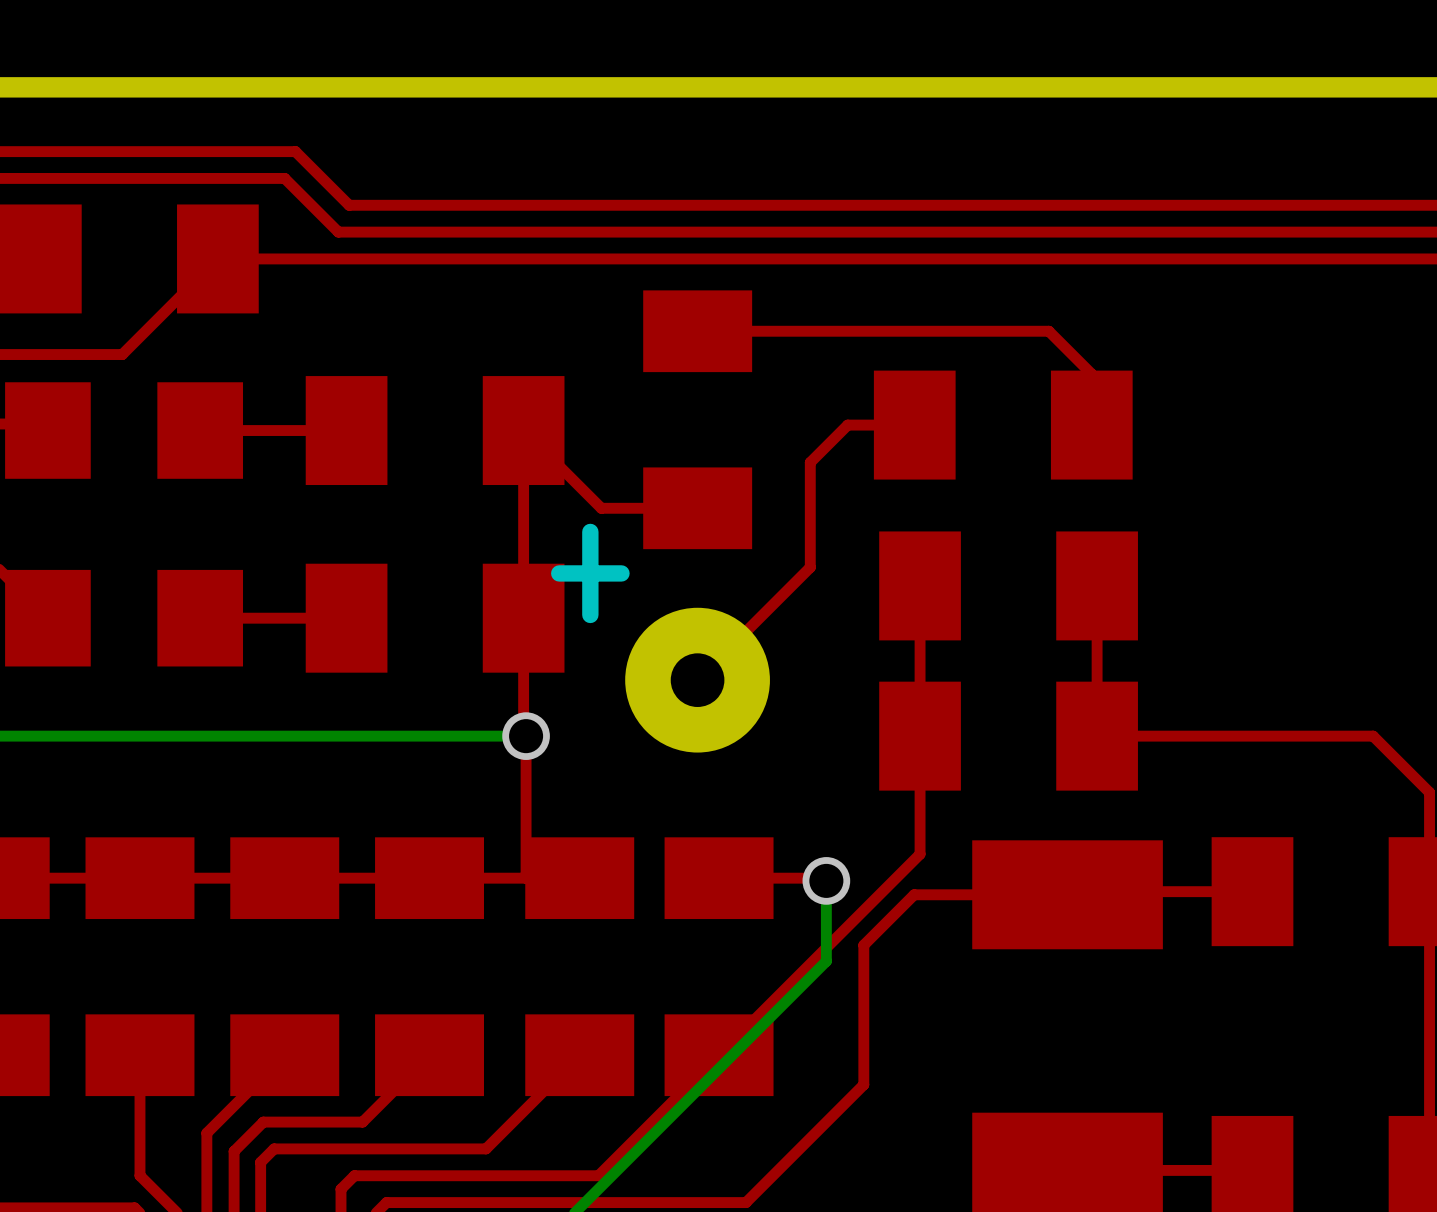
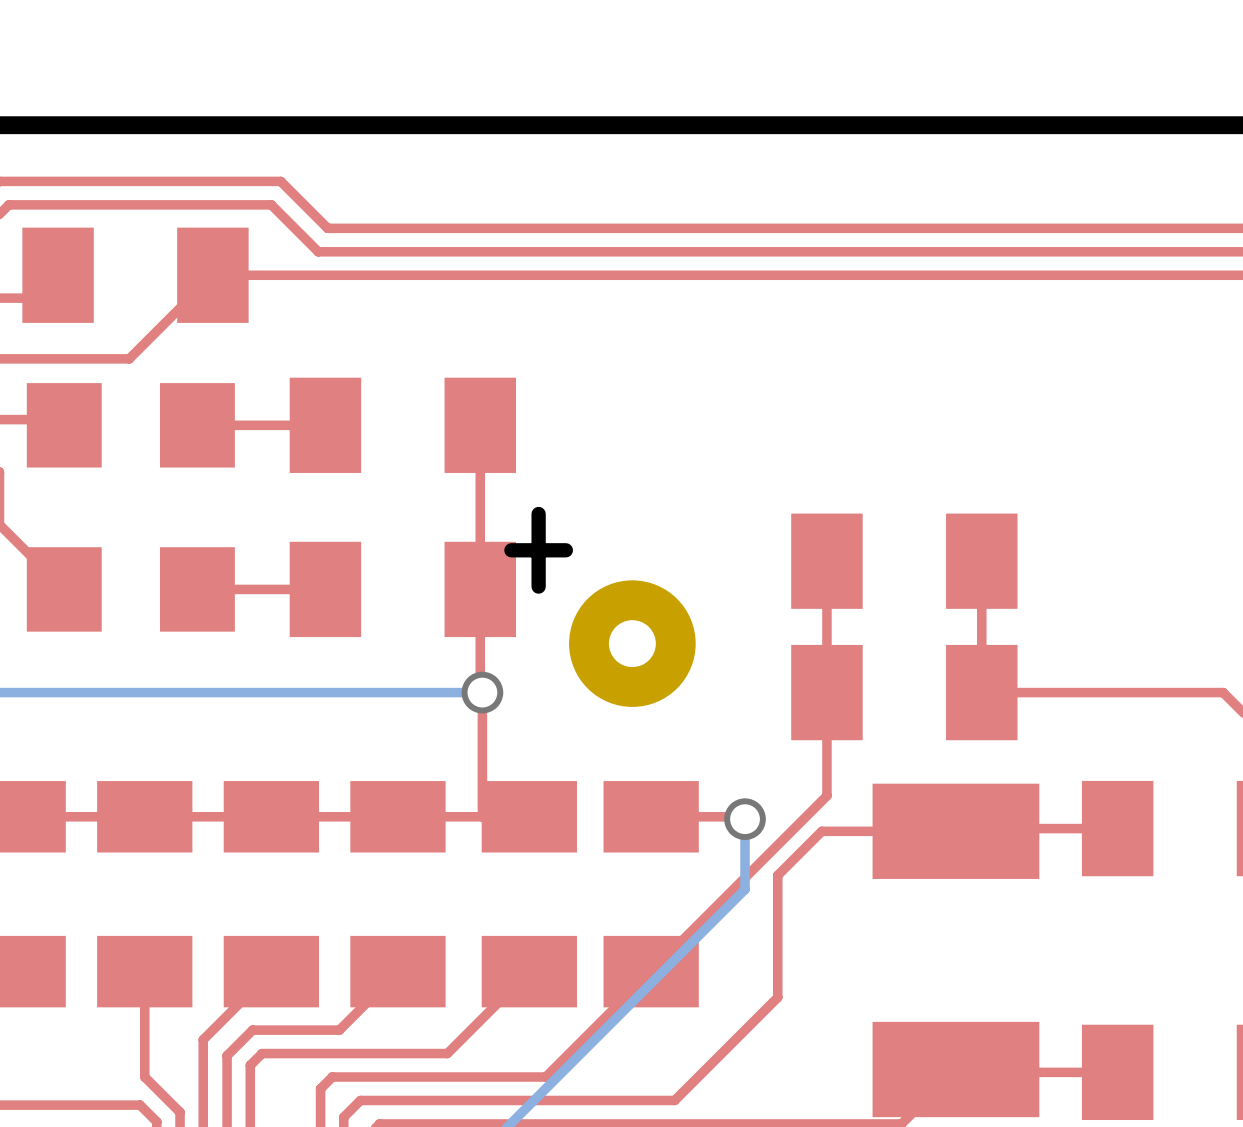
top track: (697, 331) (1048, 331) (1091, 374) (1091, 425) -> none
part: (697, 419) -> none
top track: (914, 425) (847, 425) (810, 462) (810, 567) (697, 680) -> none
part: (1003, 425) -> none
top track: (523, 430) (601, 508) (697, 508) -> none

